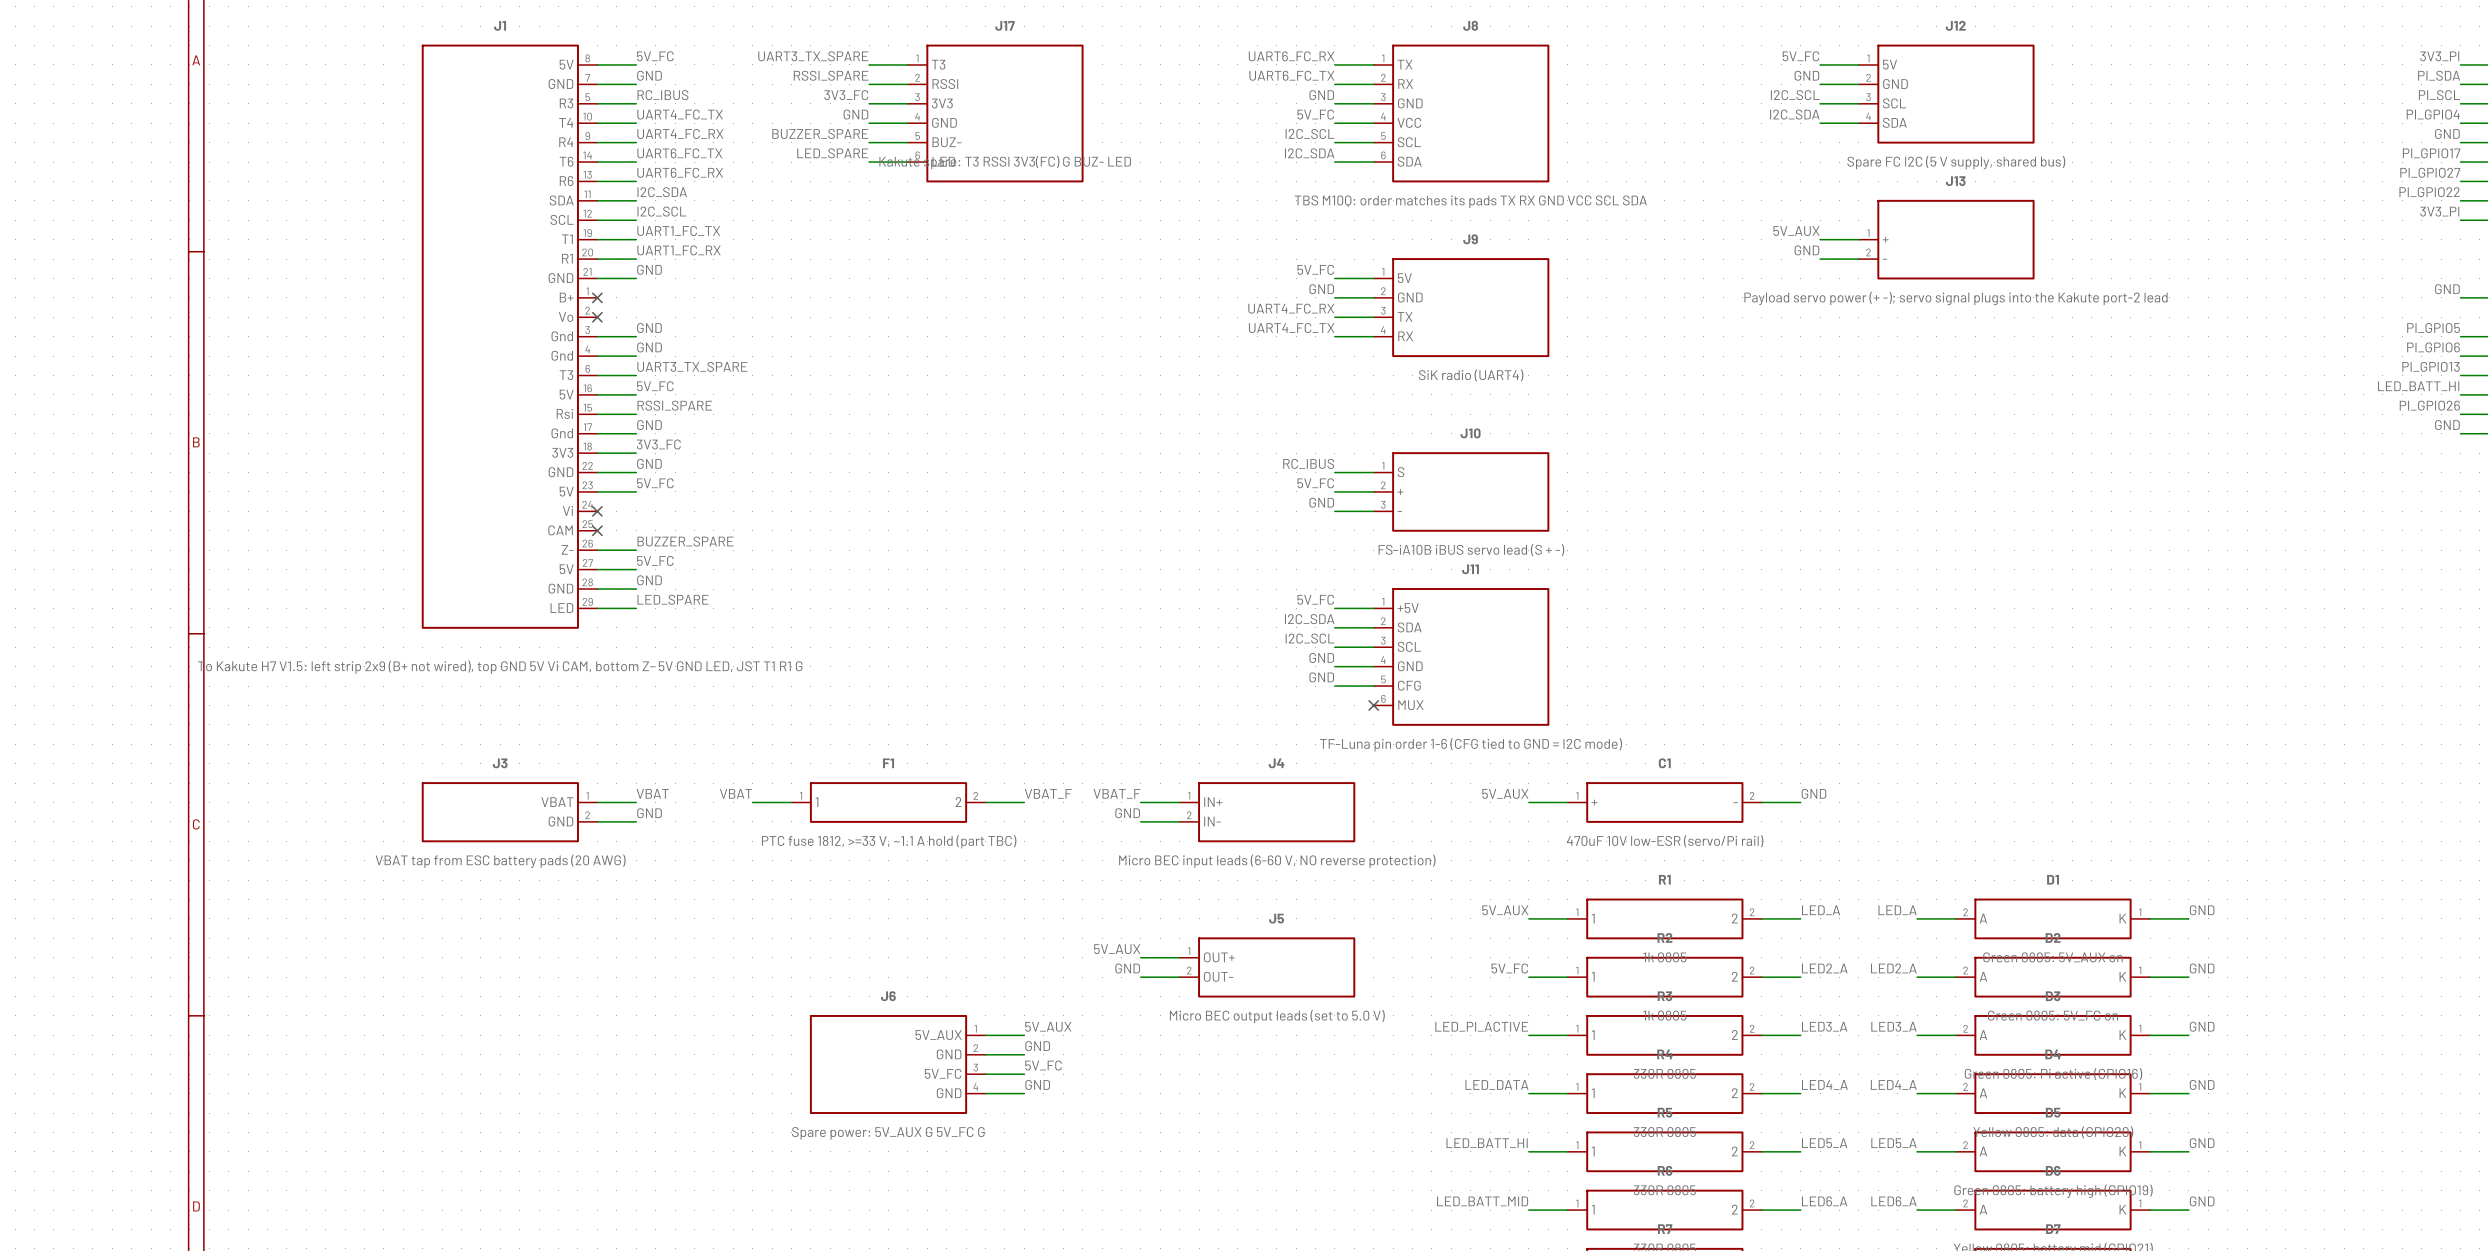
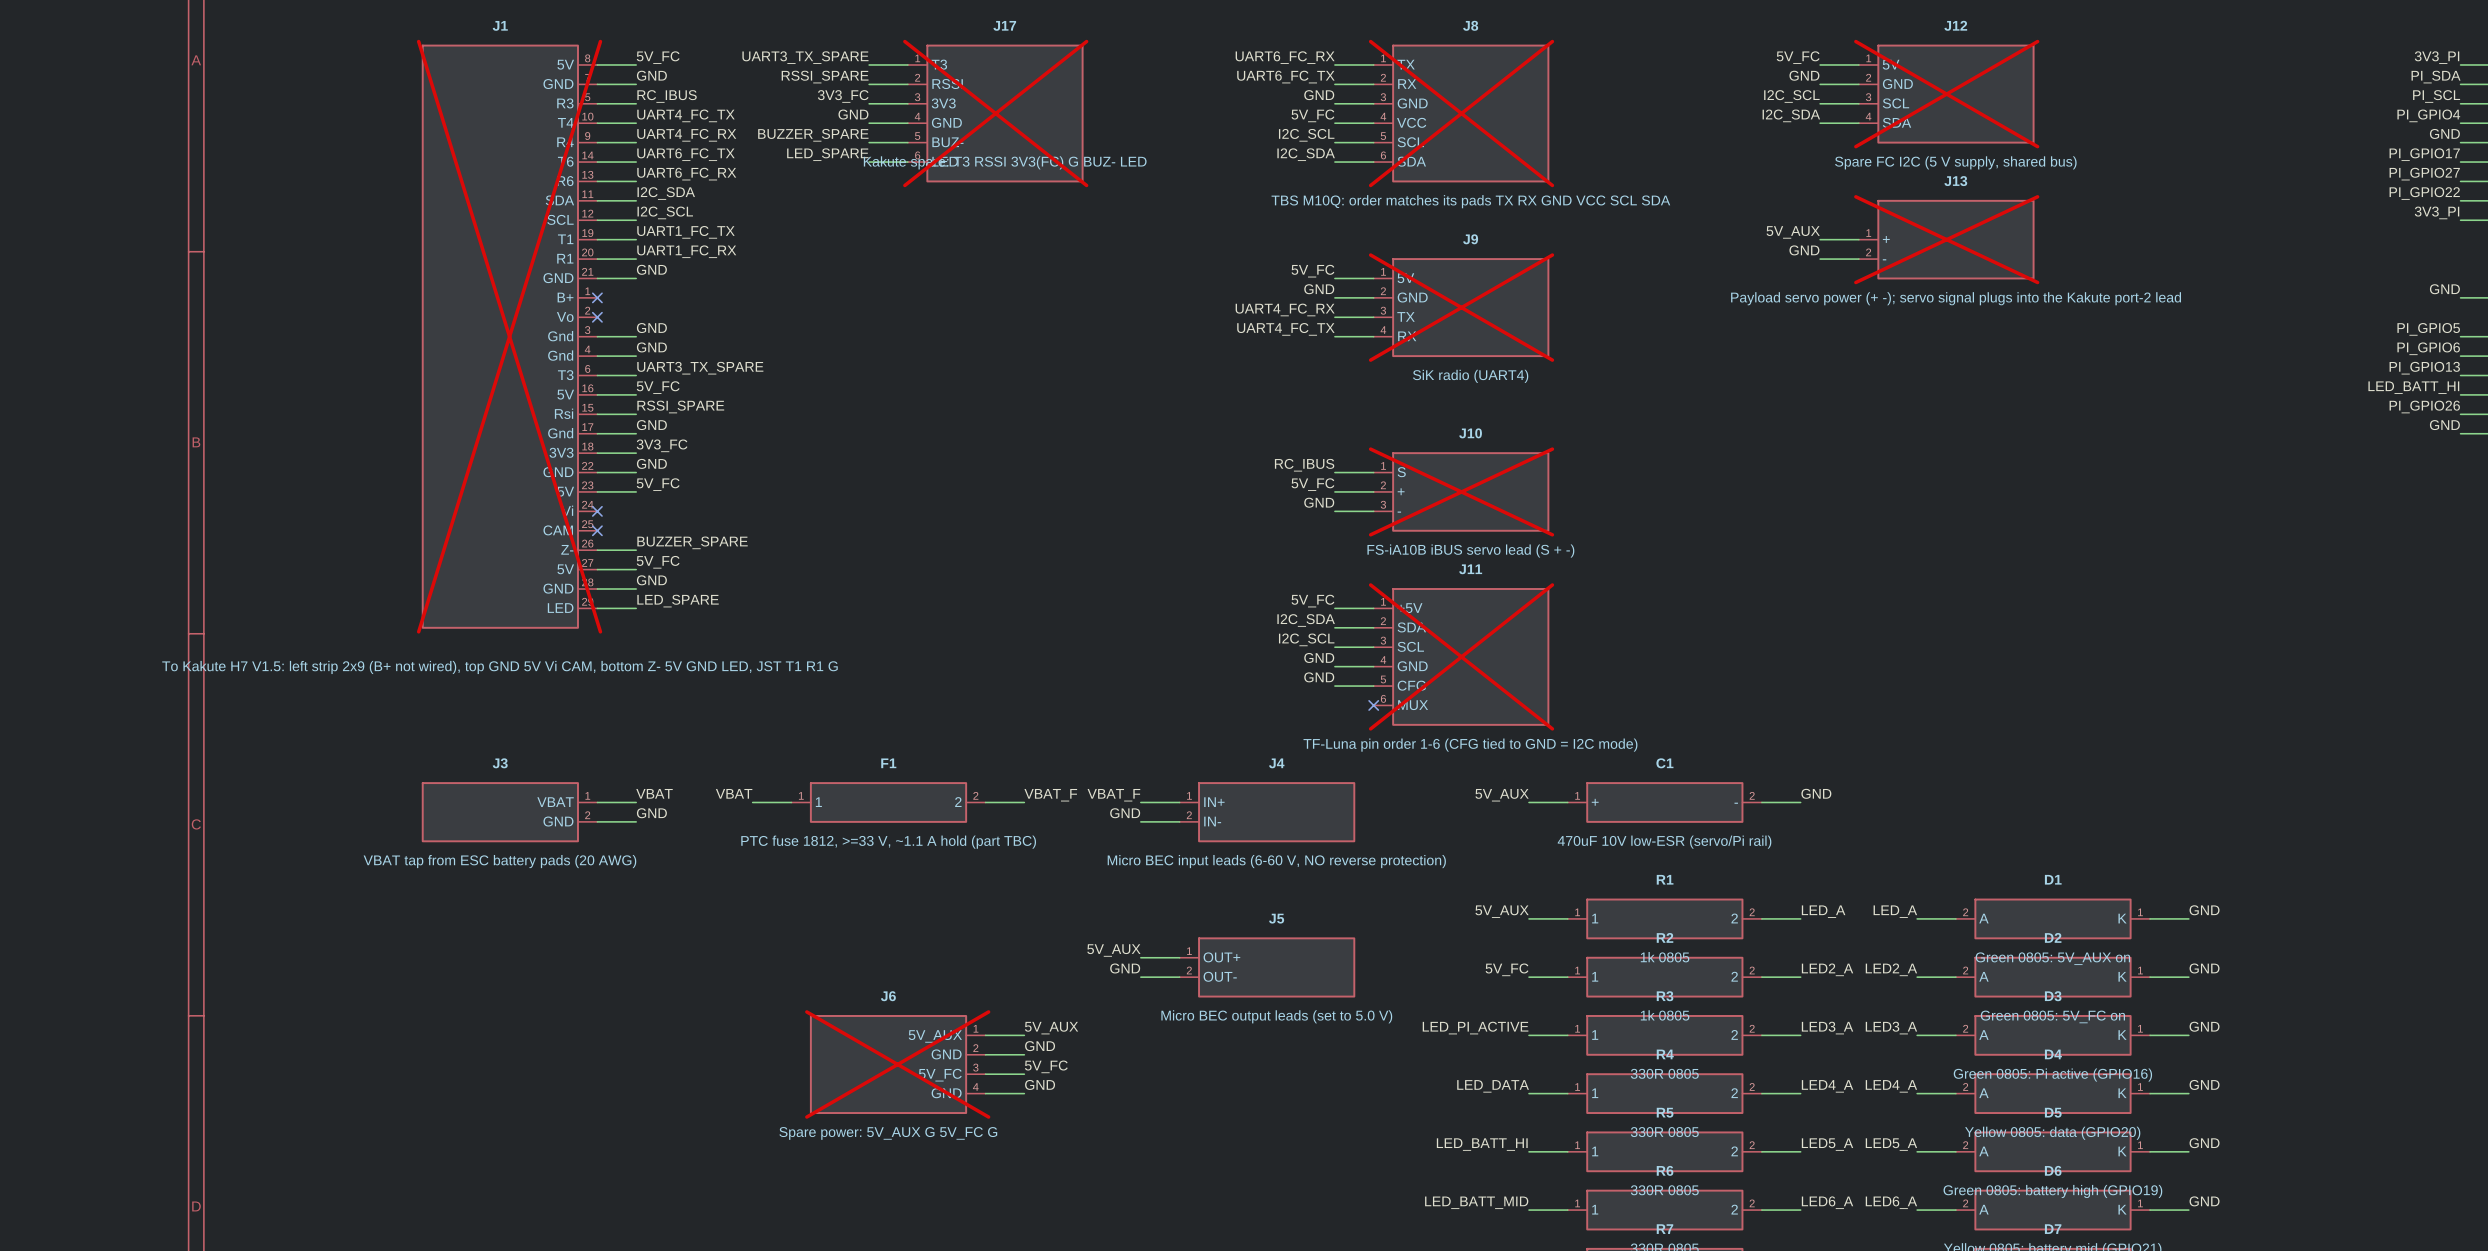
J12 do-not-place cross: none -> (1946, 94)
J17 do-not-place cross: none -> (995, 113)
J8 do-not-place cross: none -> (1461, 113)
J13 do-not-place cross: none -> (1946, 239)
J9 do-not-place cross: none -> (1461, 307)
J1 do-not-place cross: none -> (509, 336)
J10 do-not-place cross: none -> (1461, 491)
J11 do-not-place cross: none -> (1461, 656)
J6 do-not-place cross: none -> (897, 1064)

